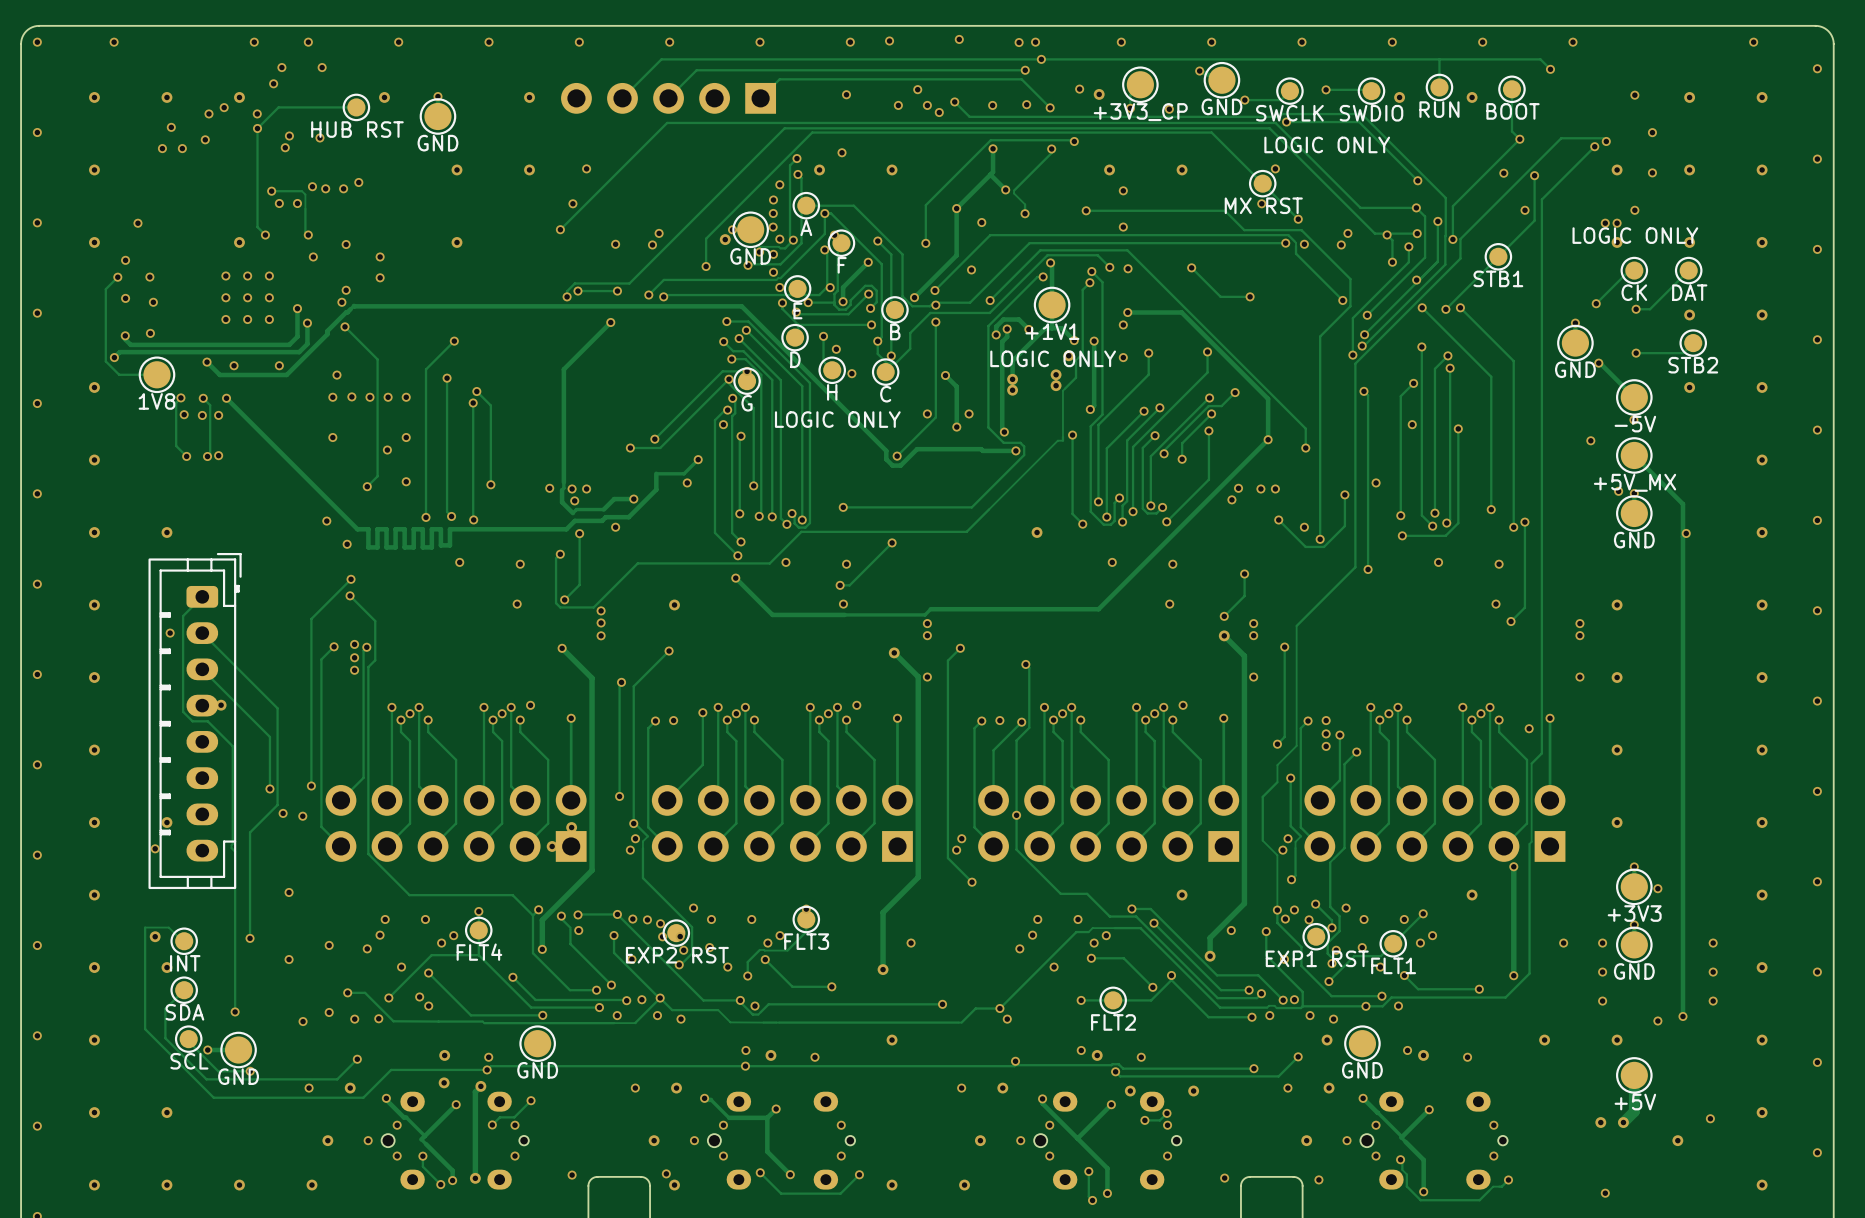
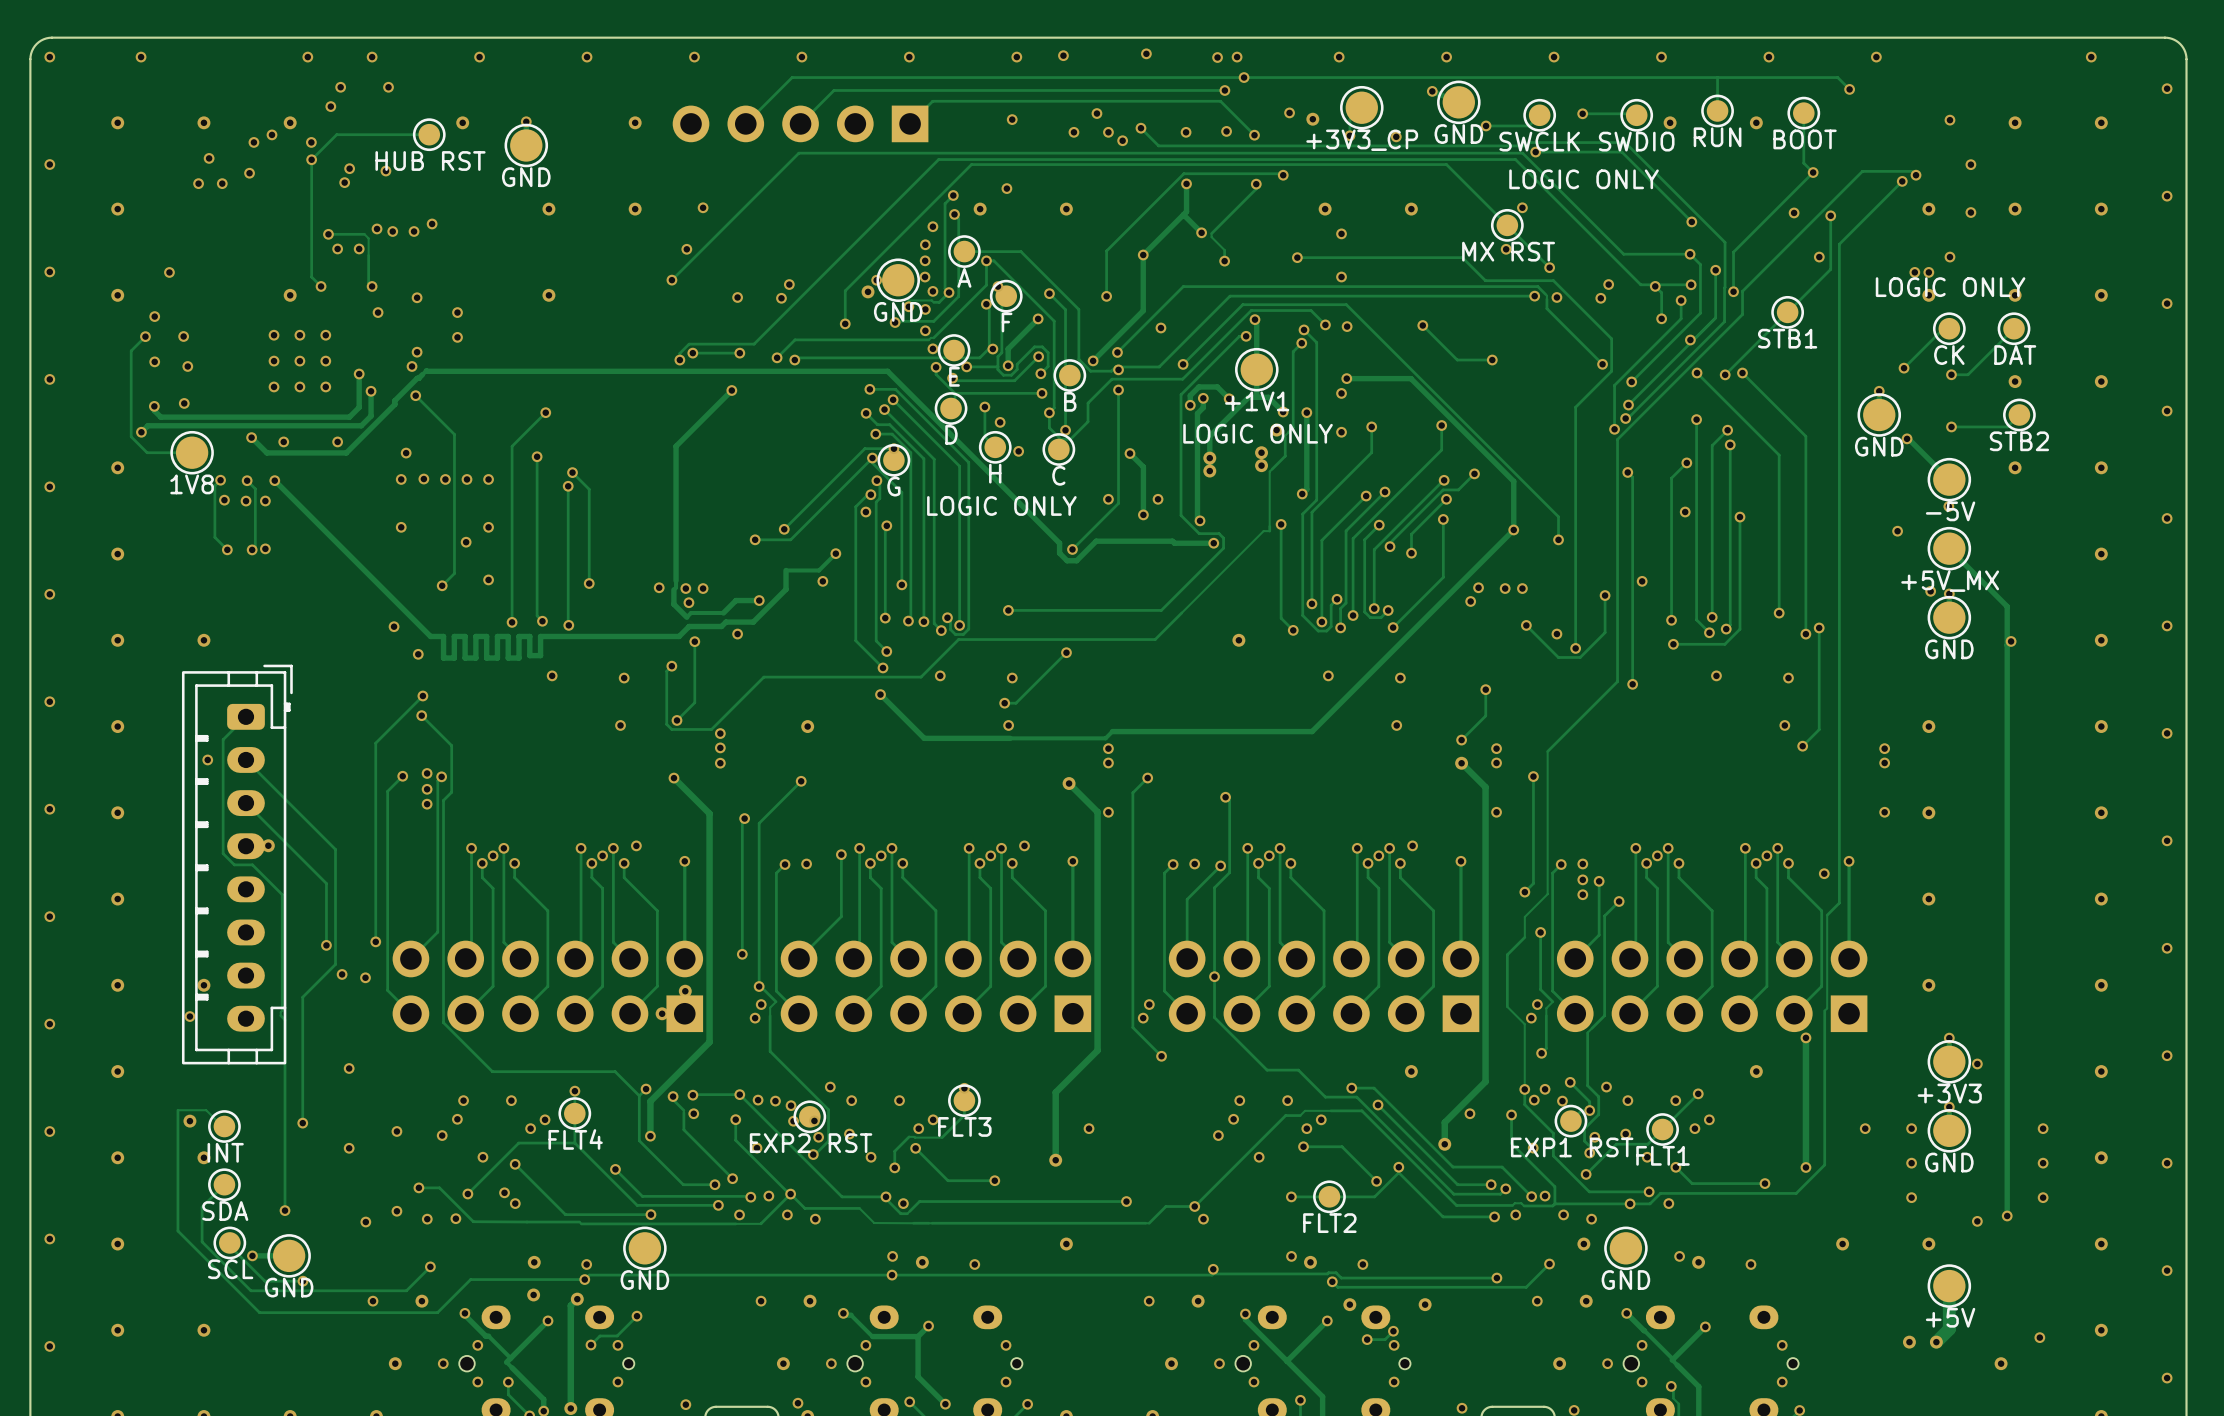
via: (981, 222) -> none

